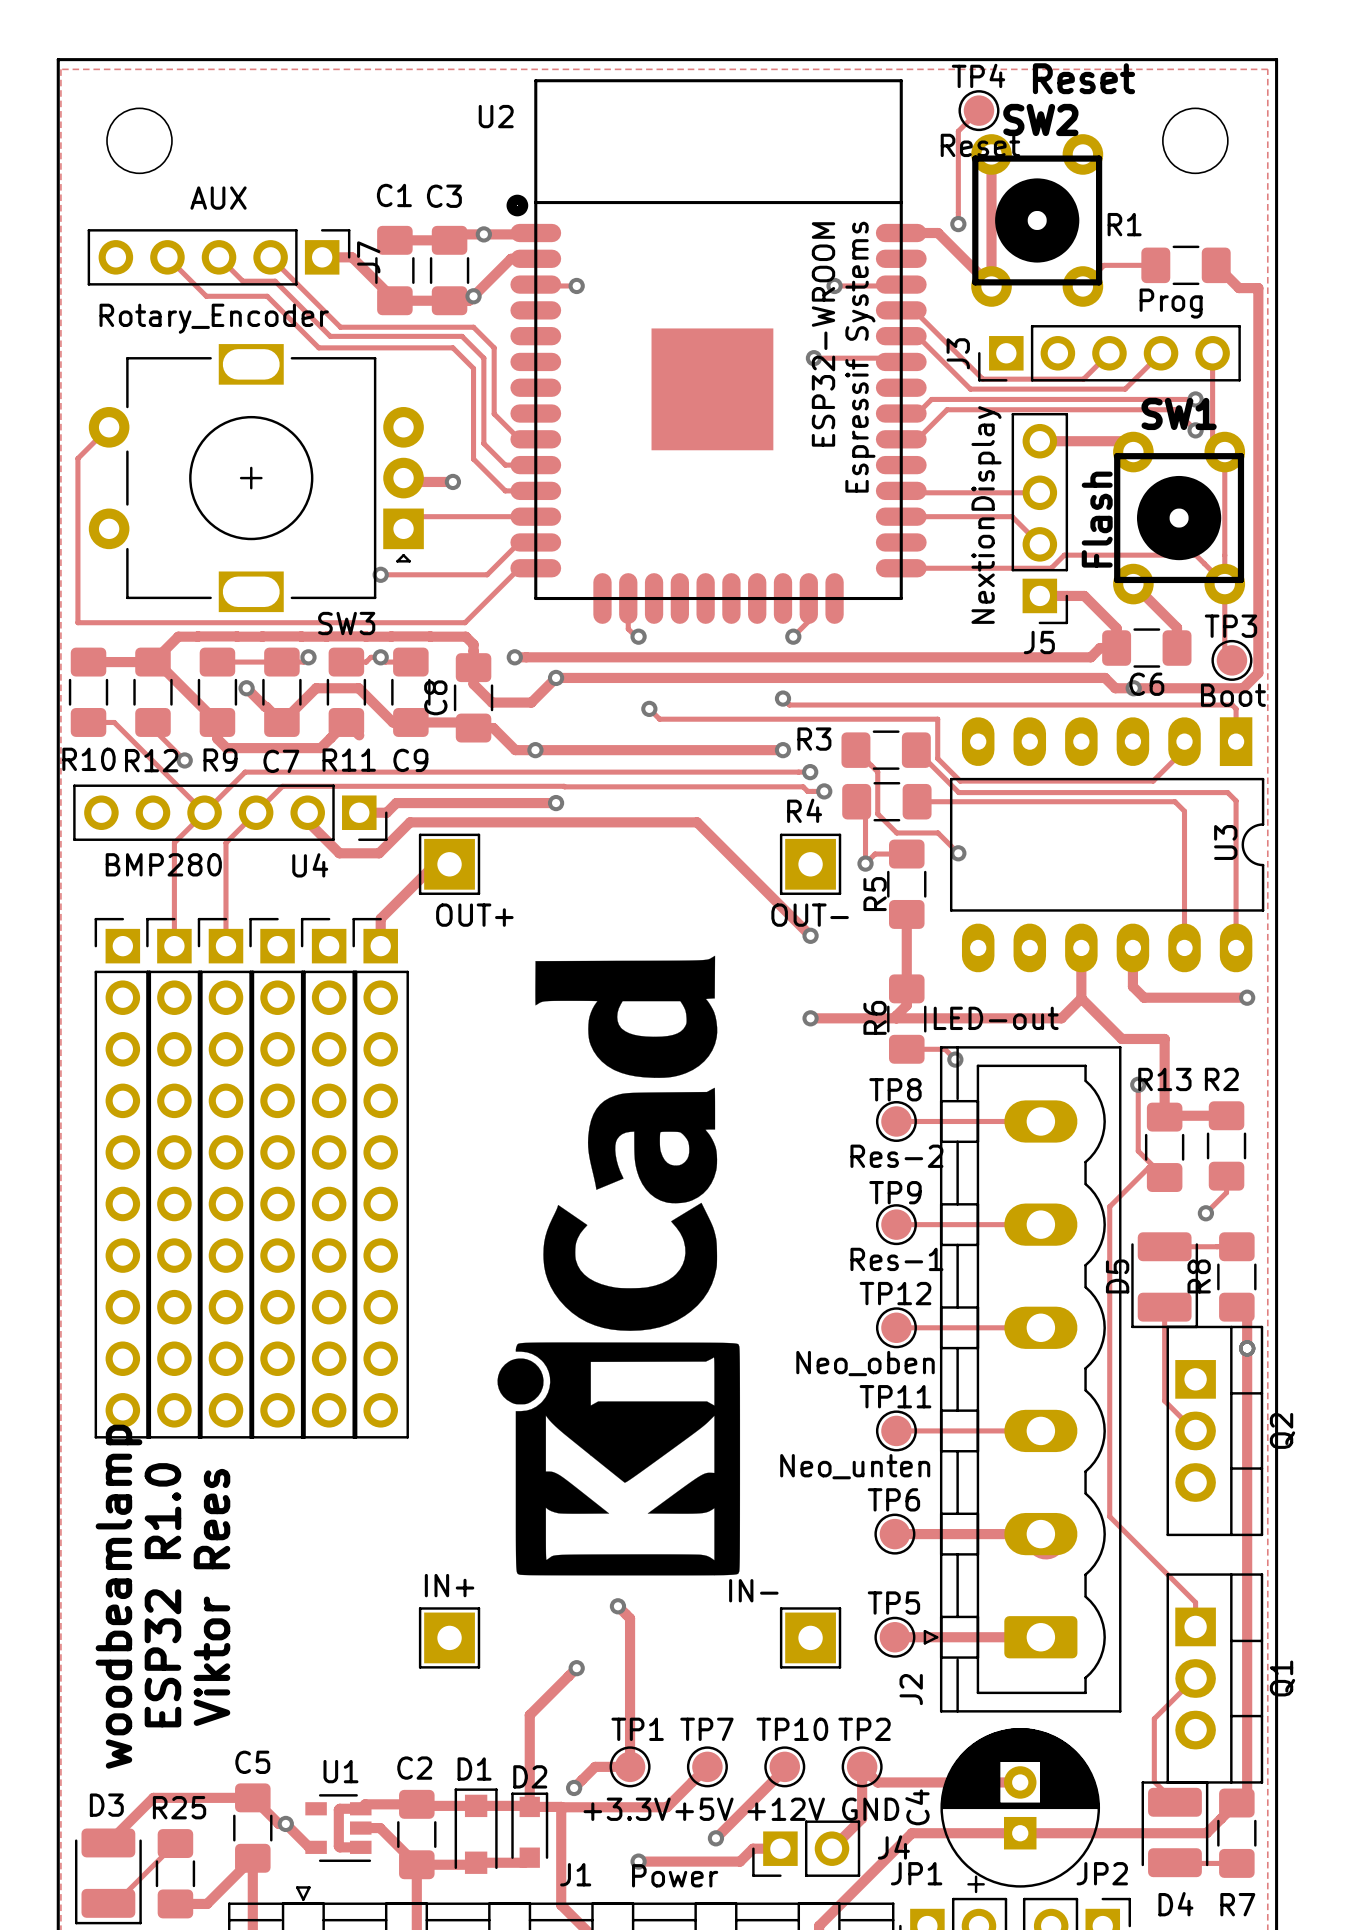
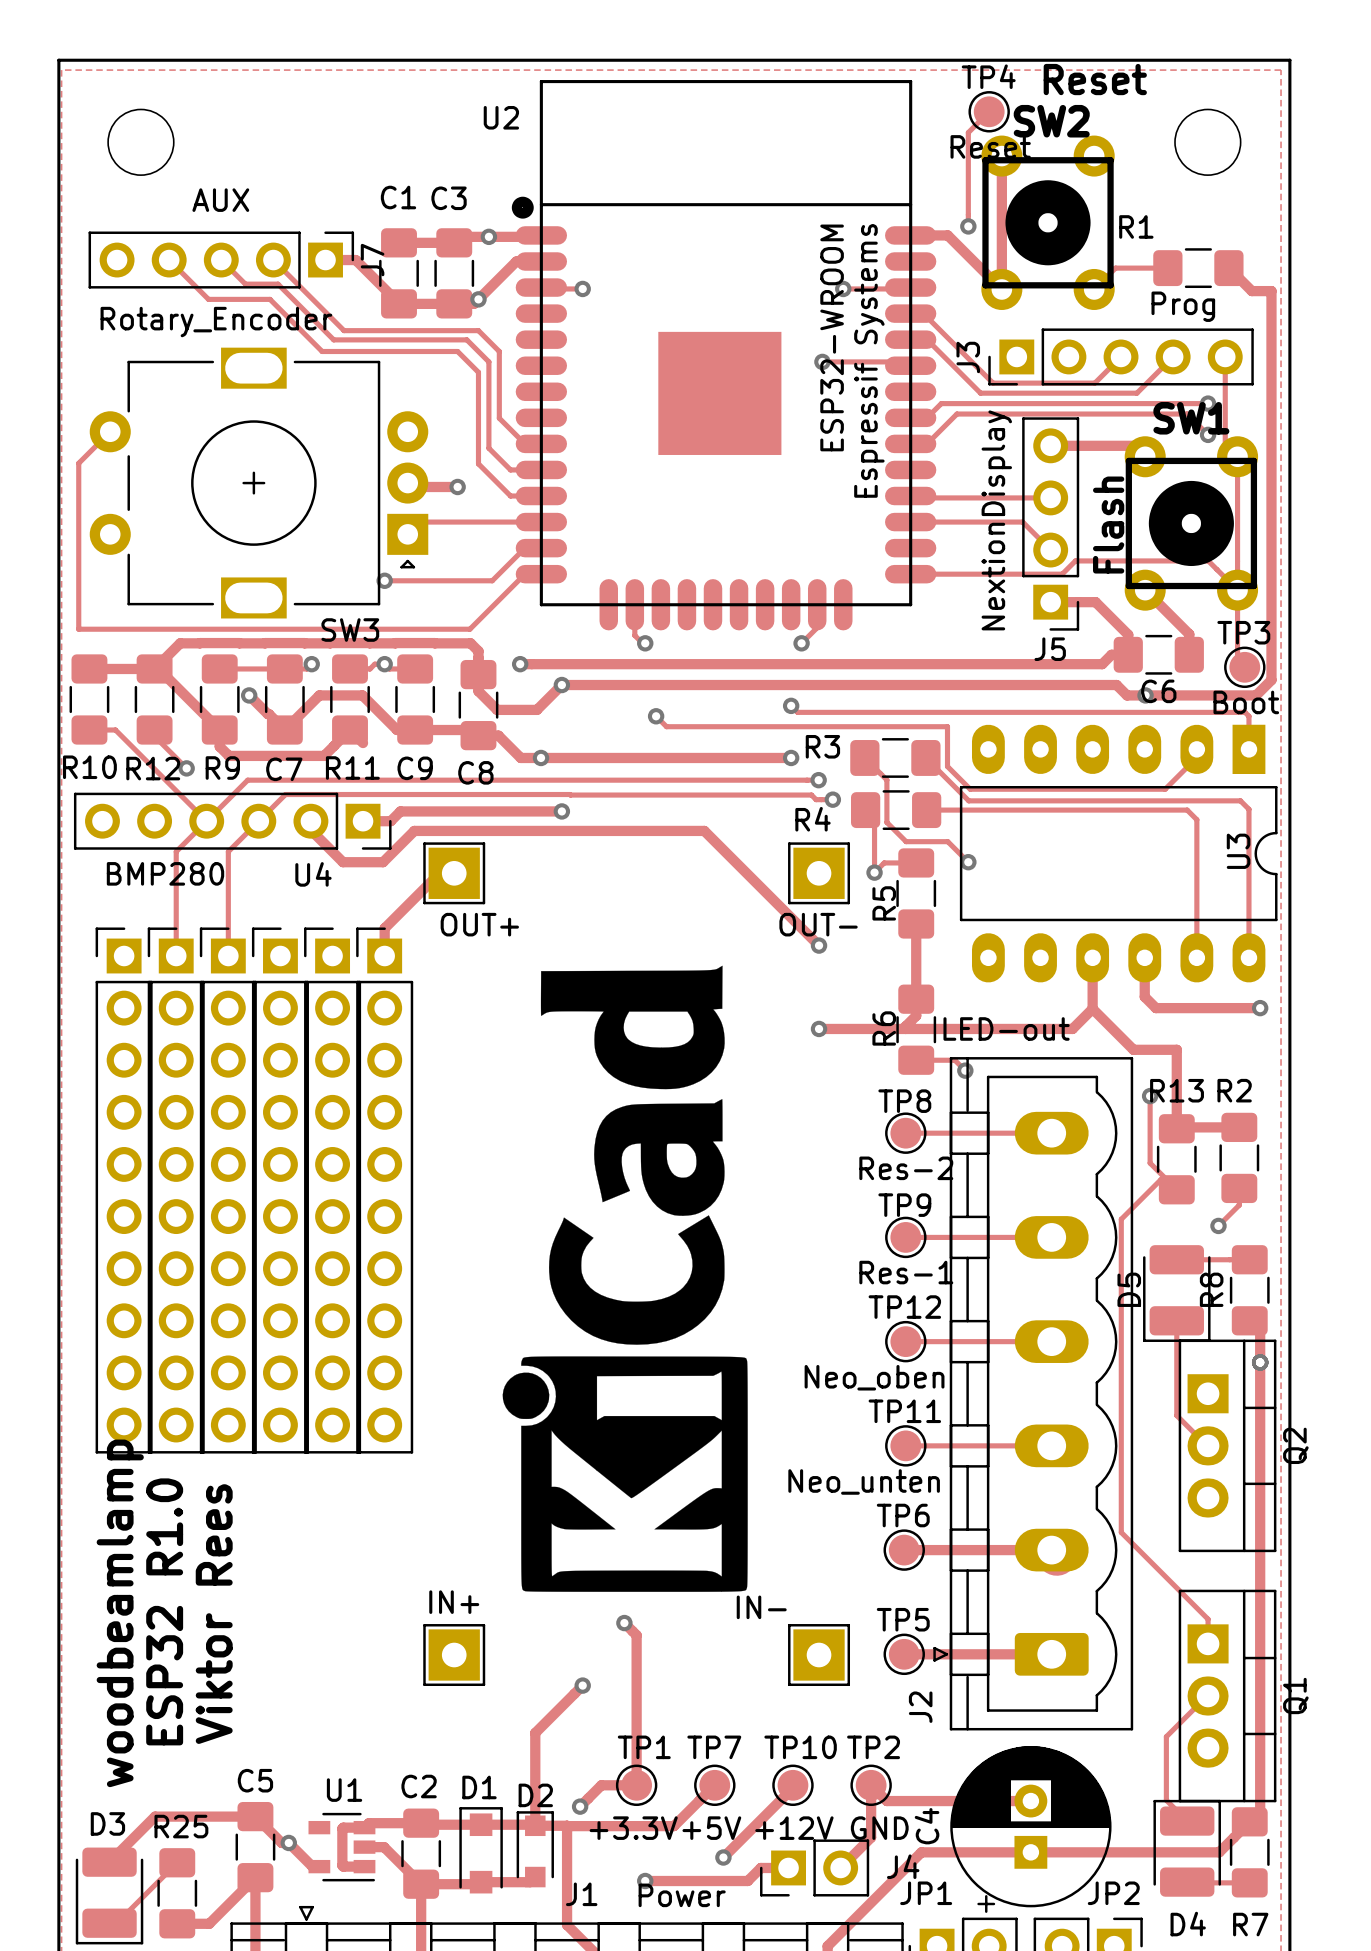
C8 name rotation: 0° (435, 697) -> 90° clockwise (475, 772)
C8 name position: C8 (435, 697) -> C8 (475, 772)

